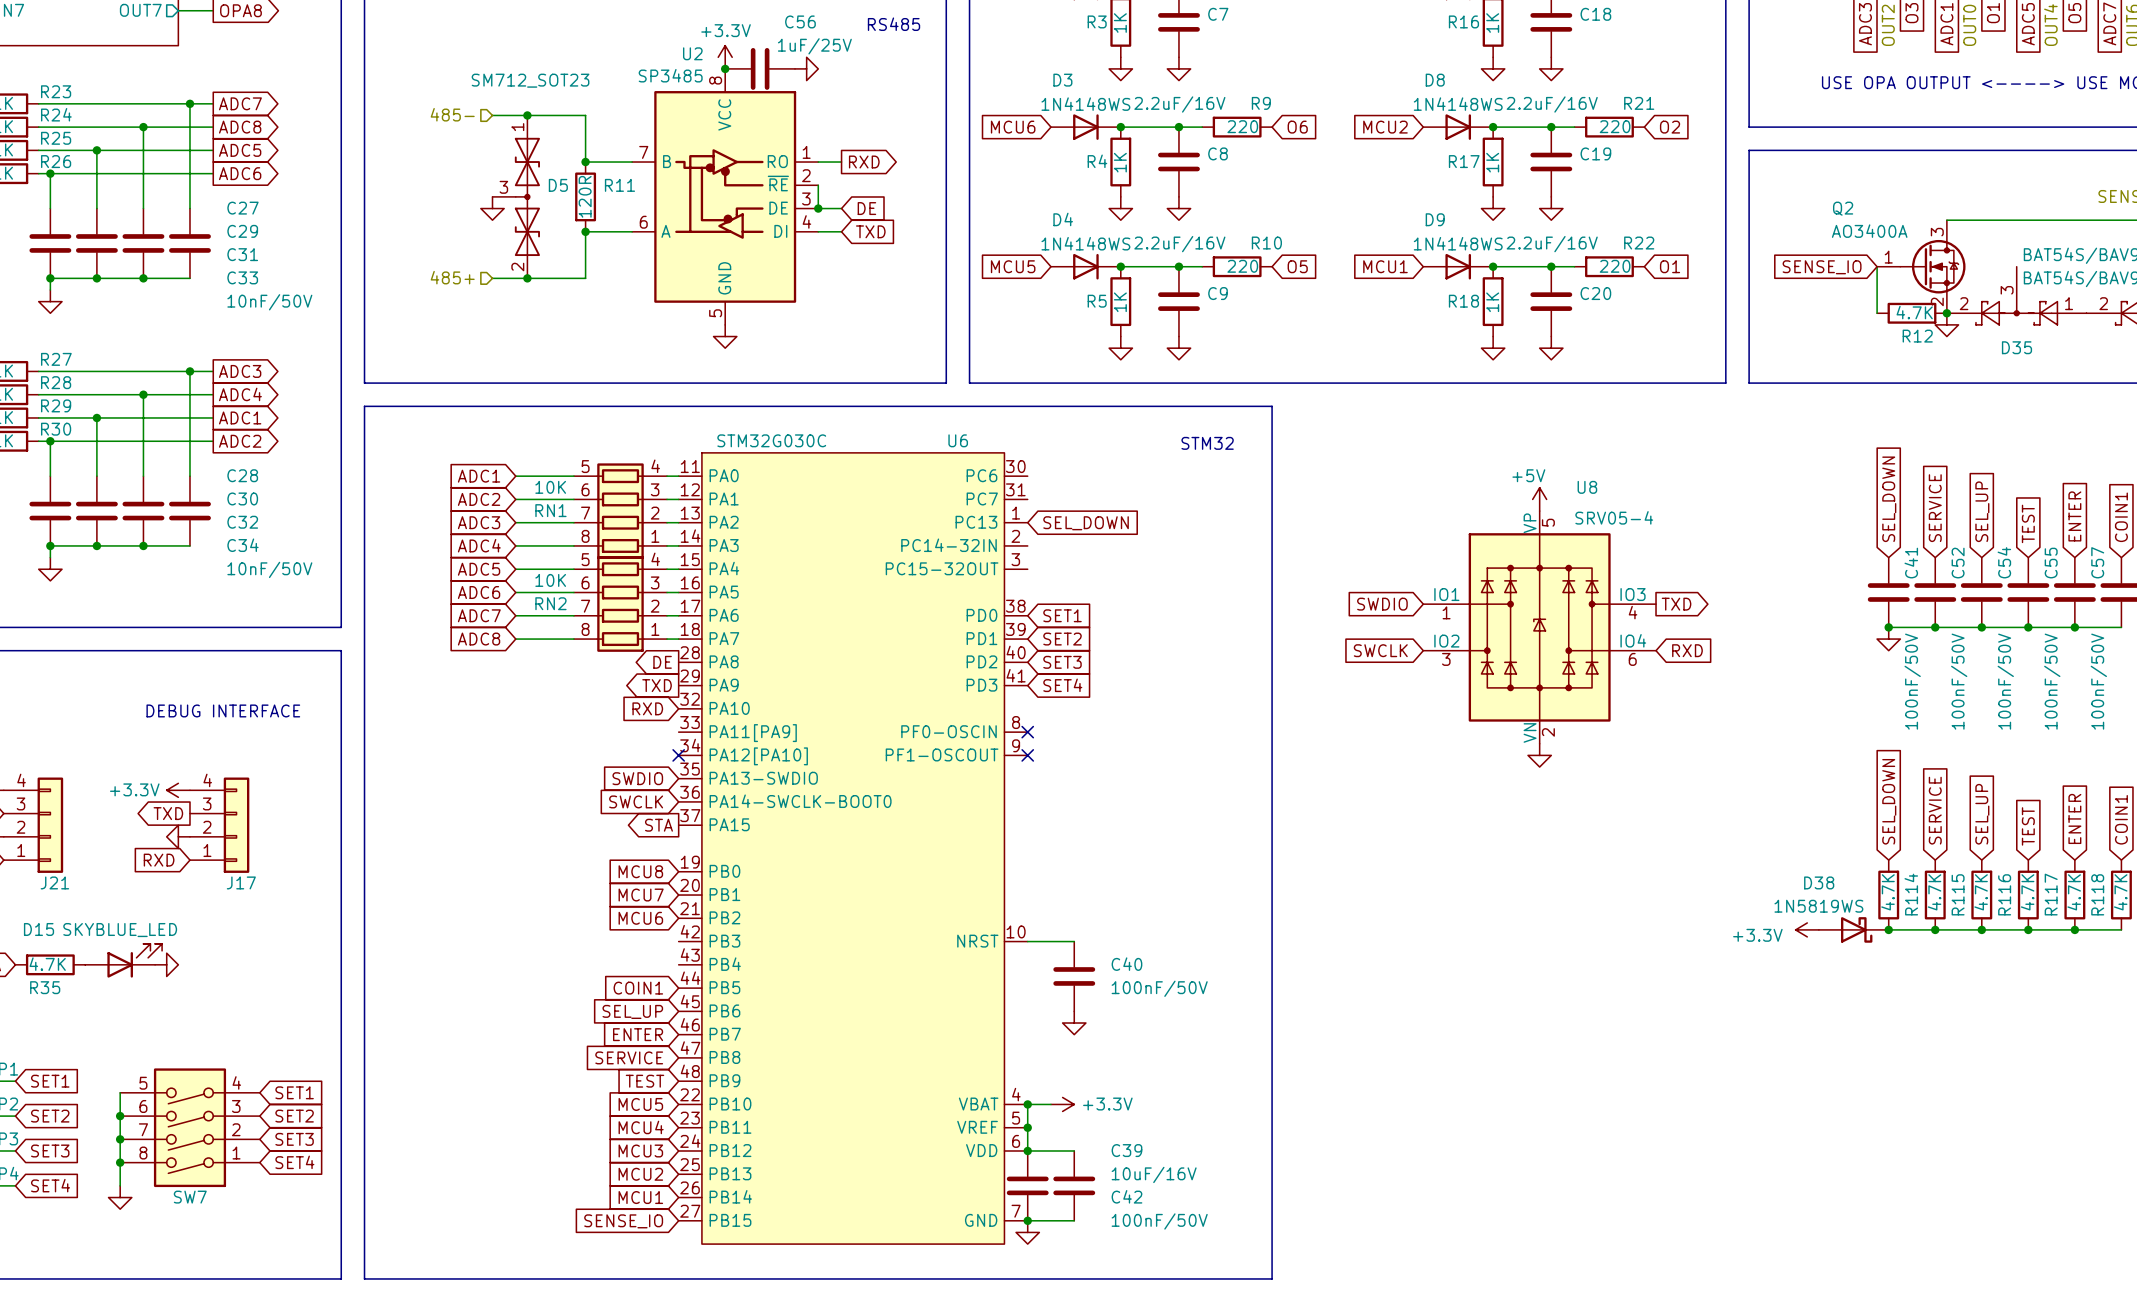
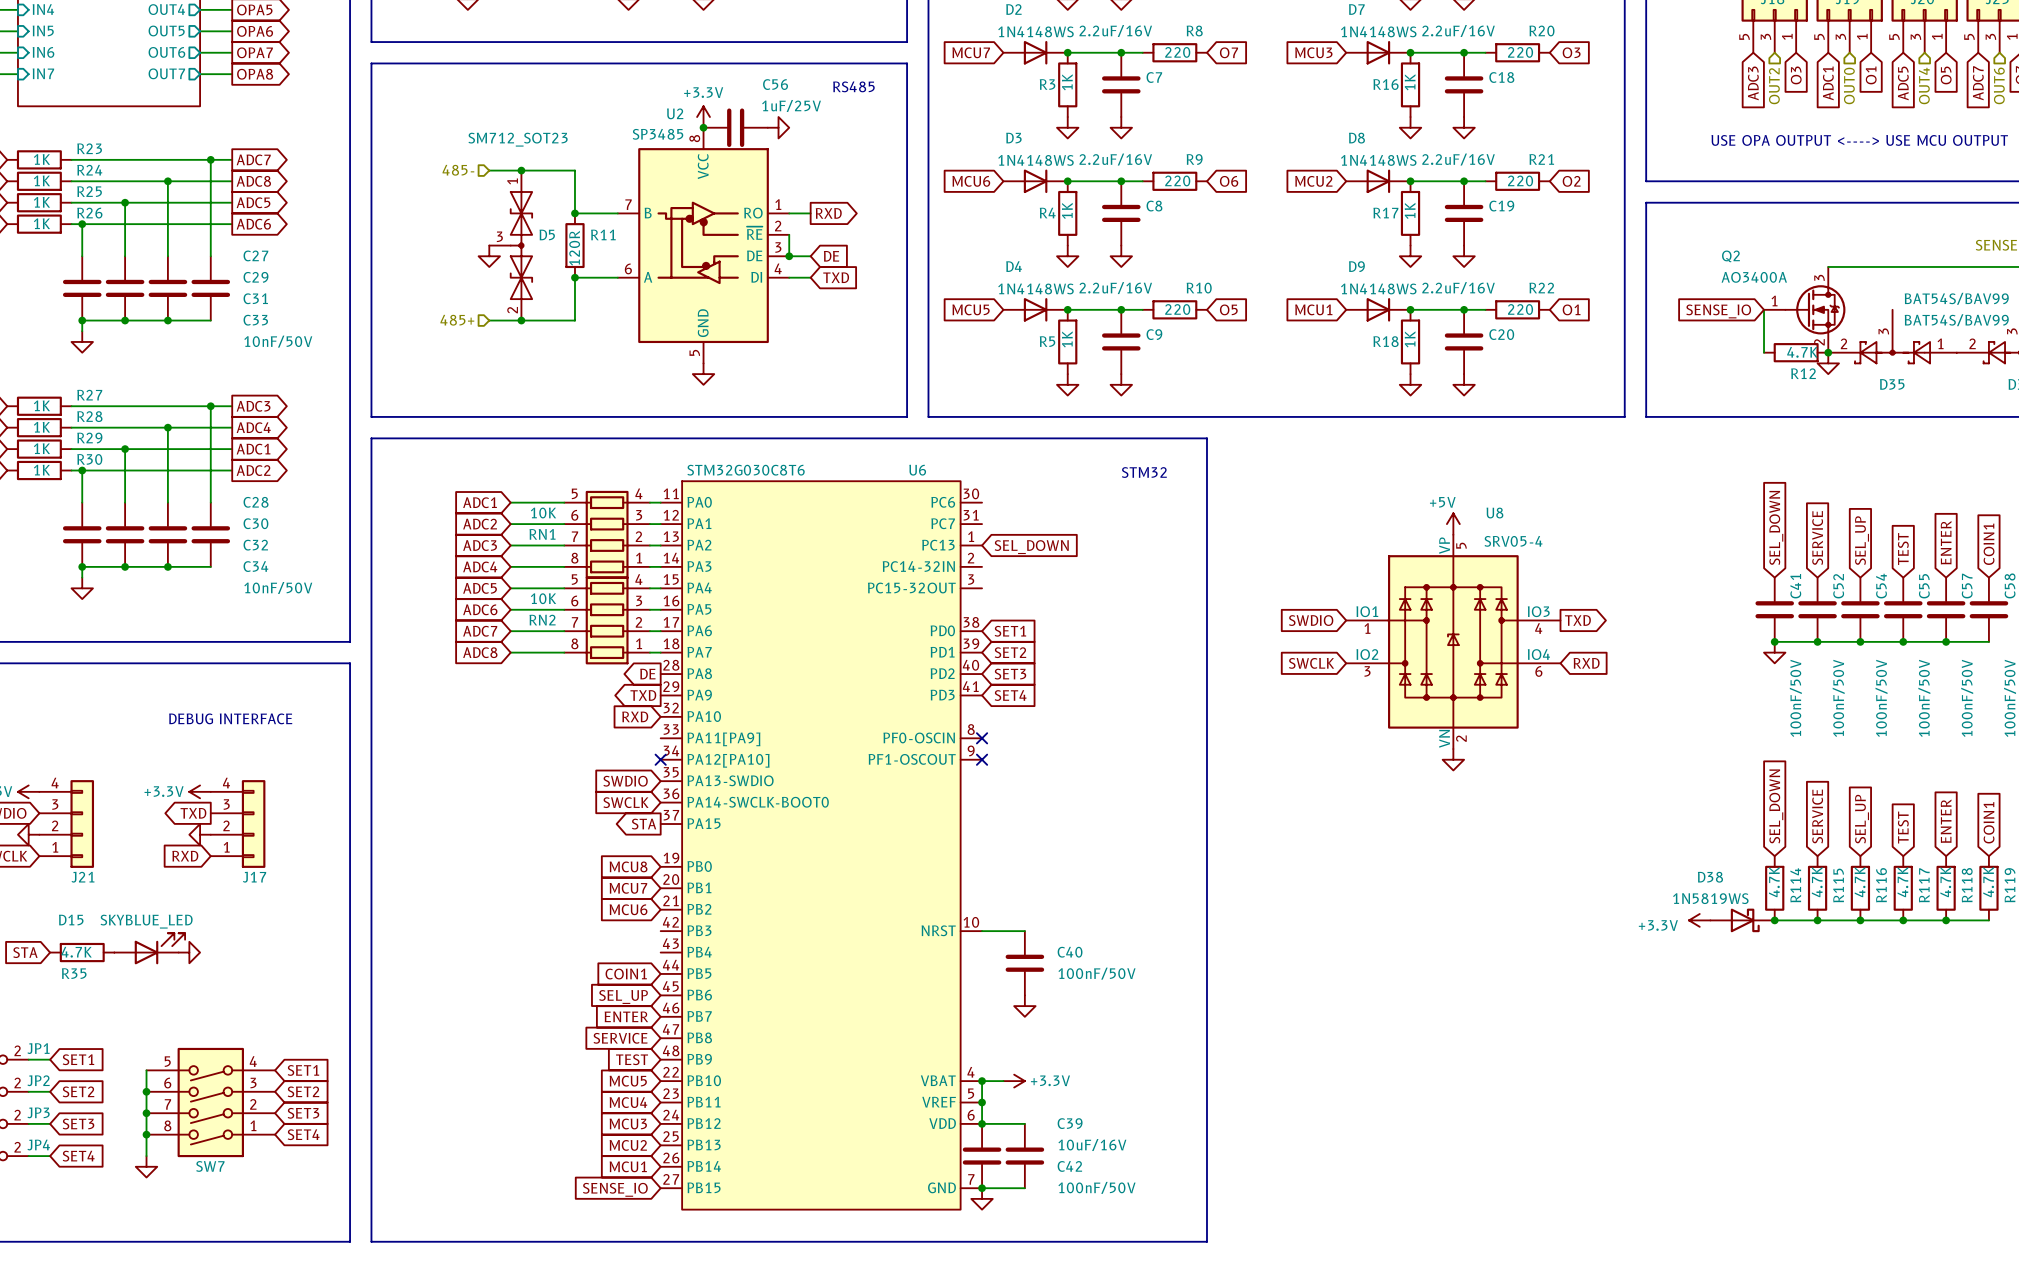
U6 value: STM32G030C (771, 440) -> STM32G030C8T6 (746, 470)

